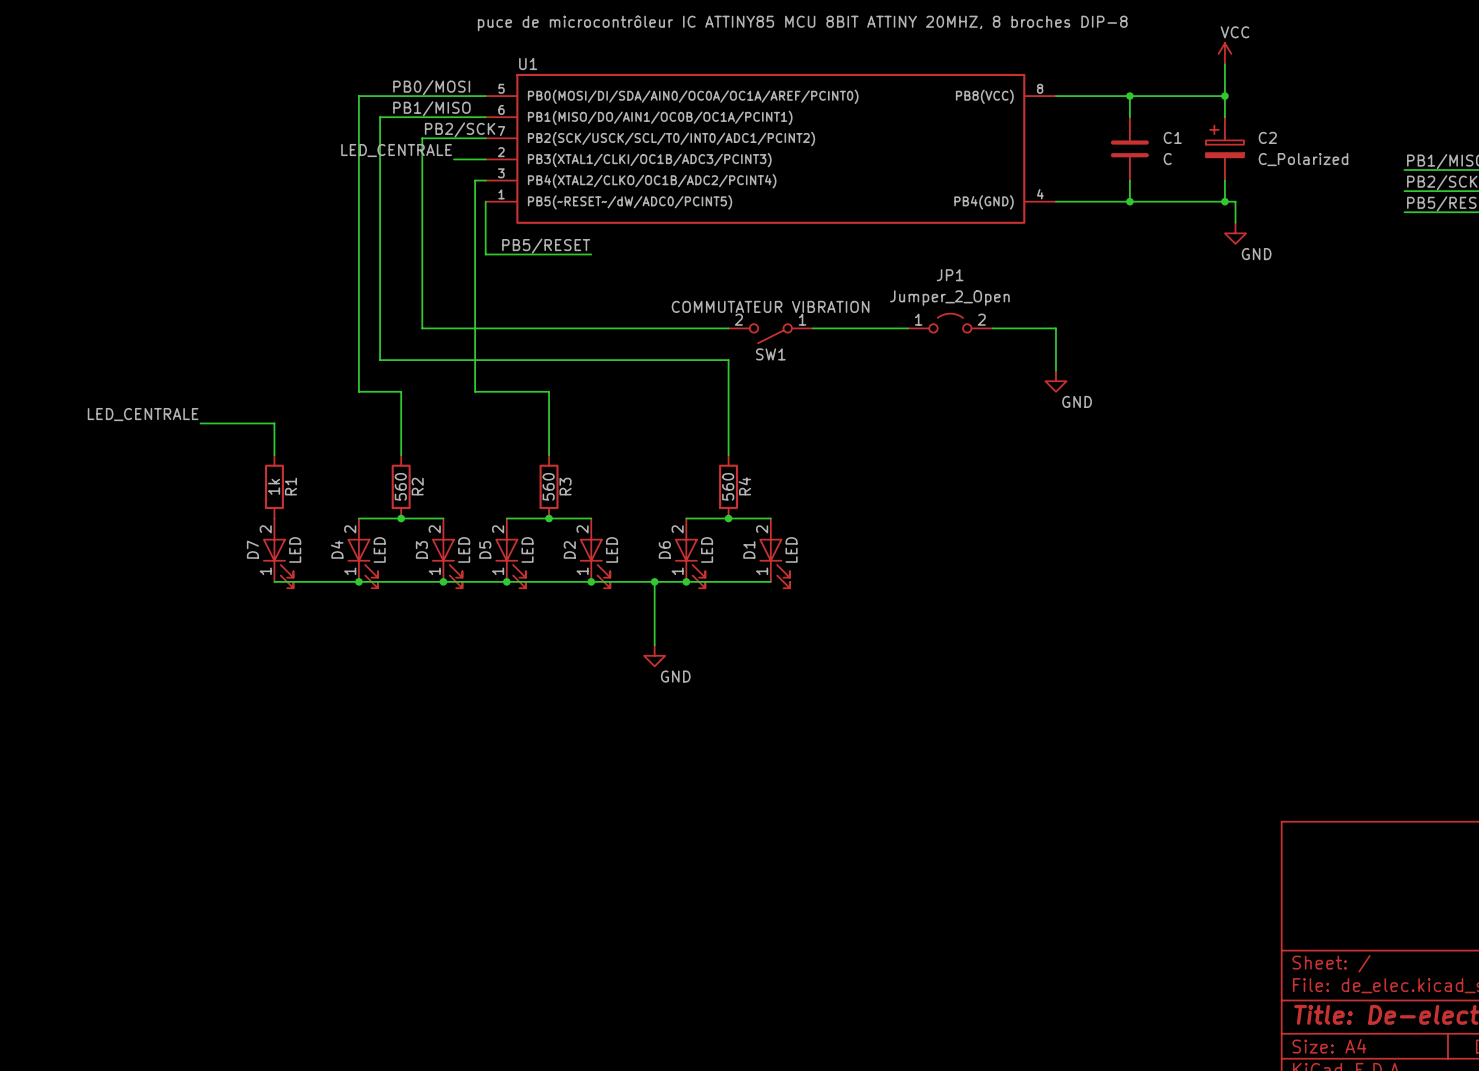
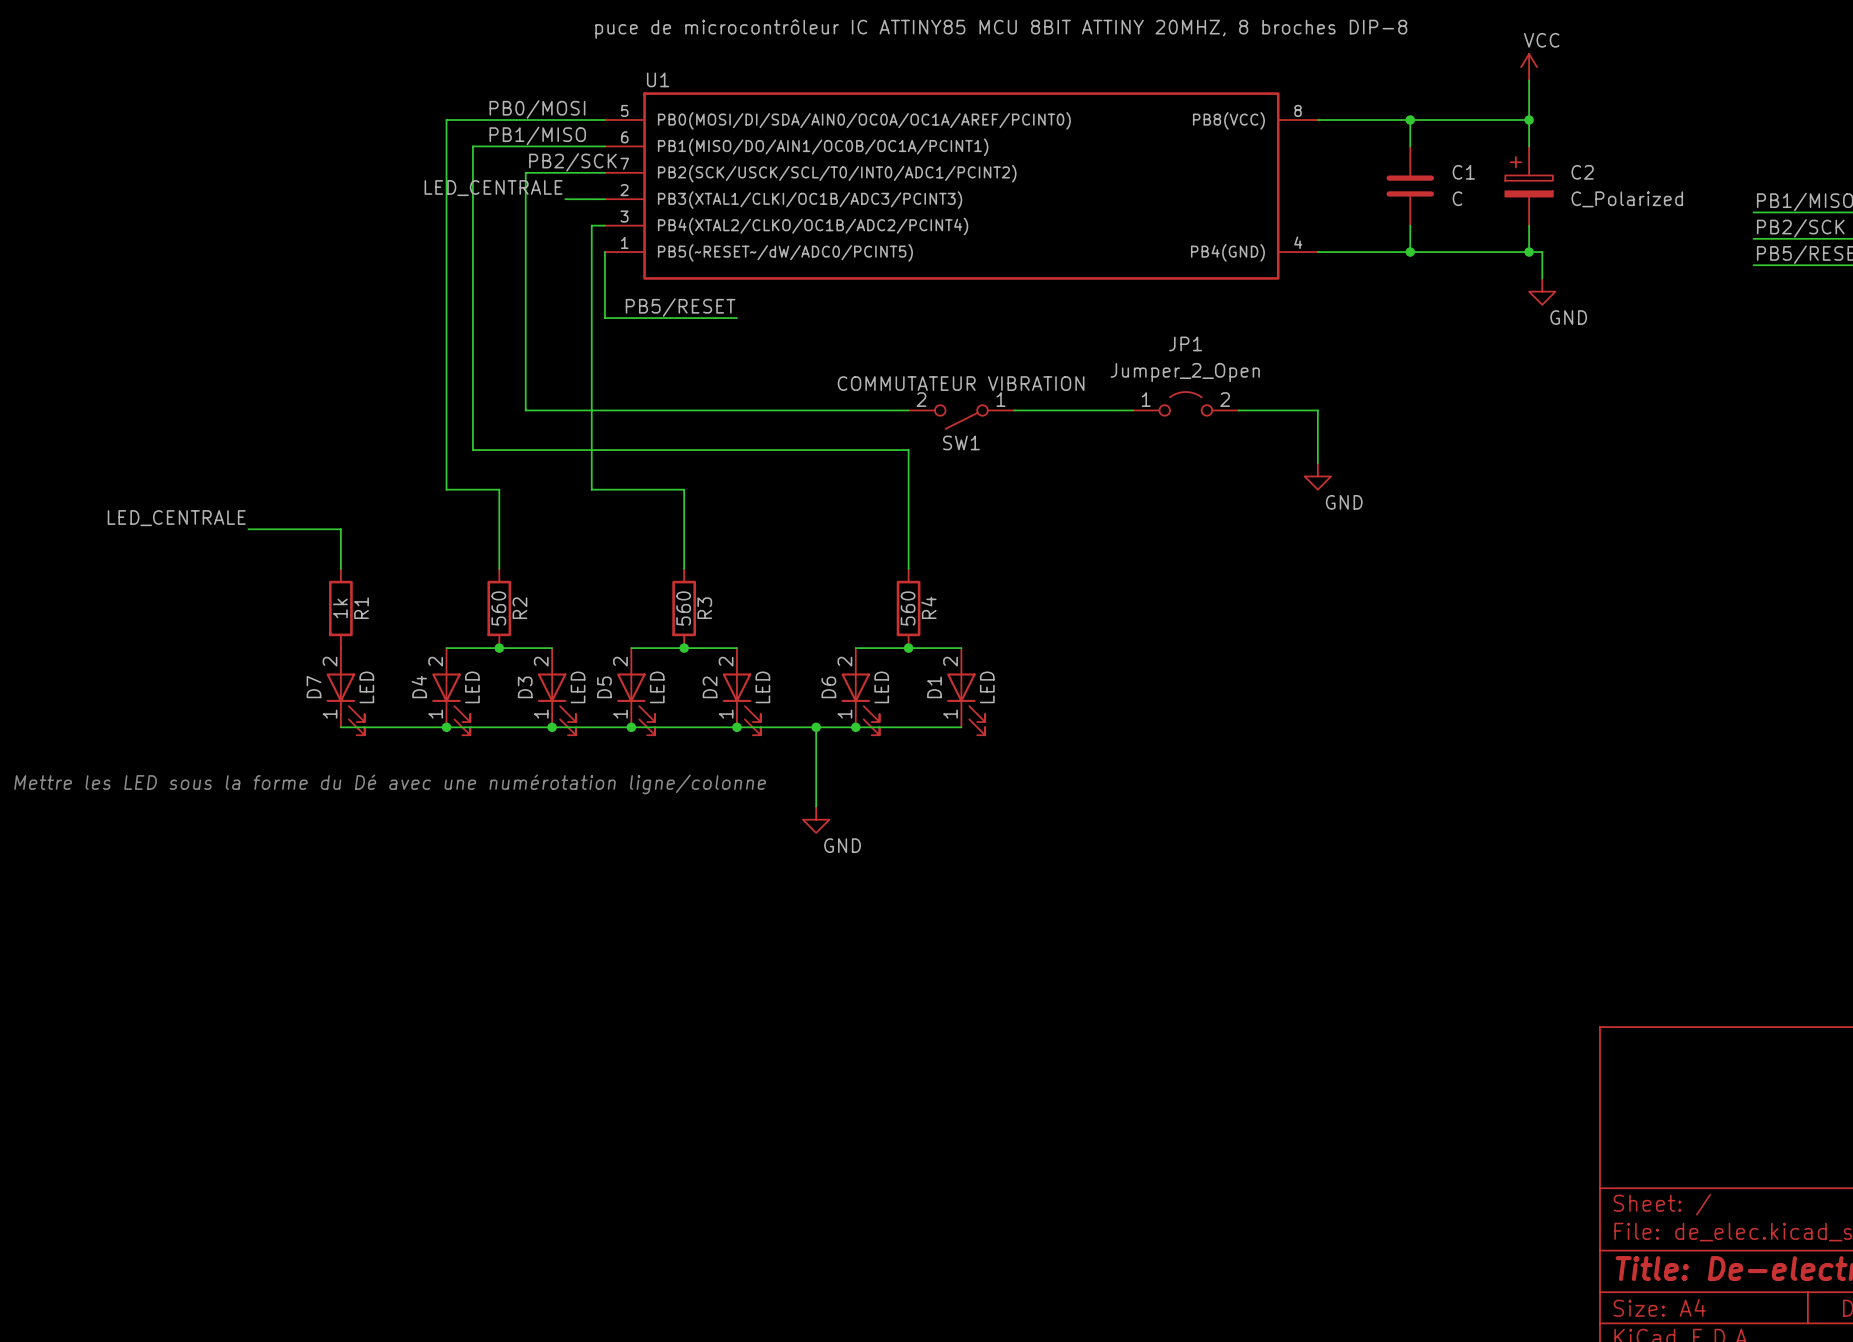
text: none -> Mettre les LED sous la forme du Dé avec une numérotation ligne/colonne (390, 784)

